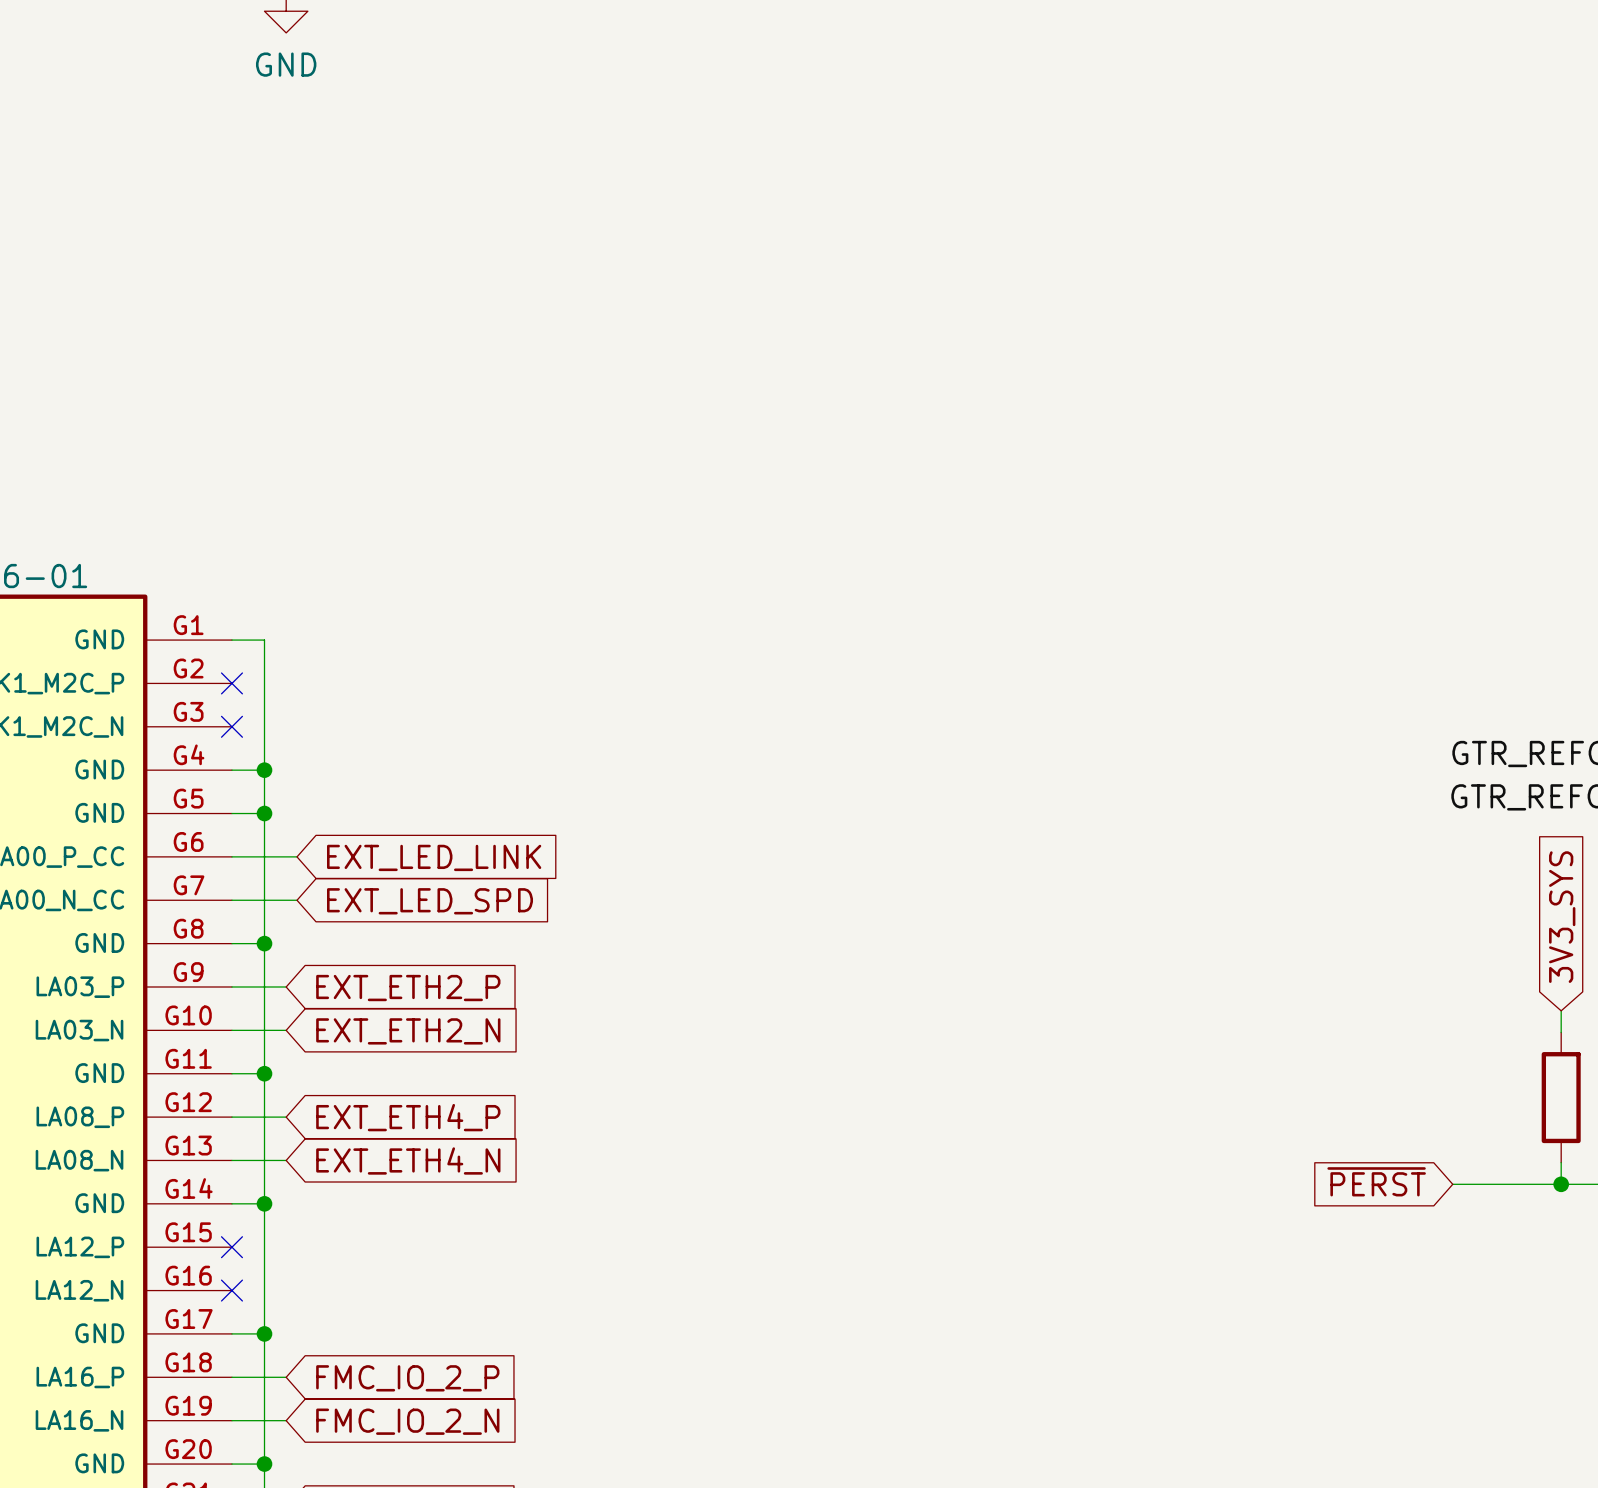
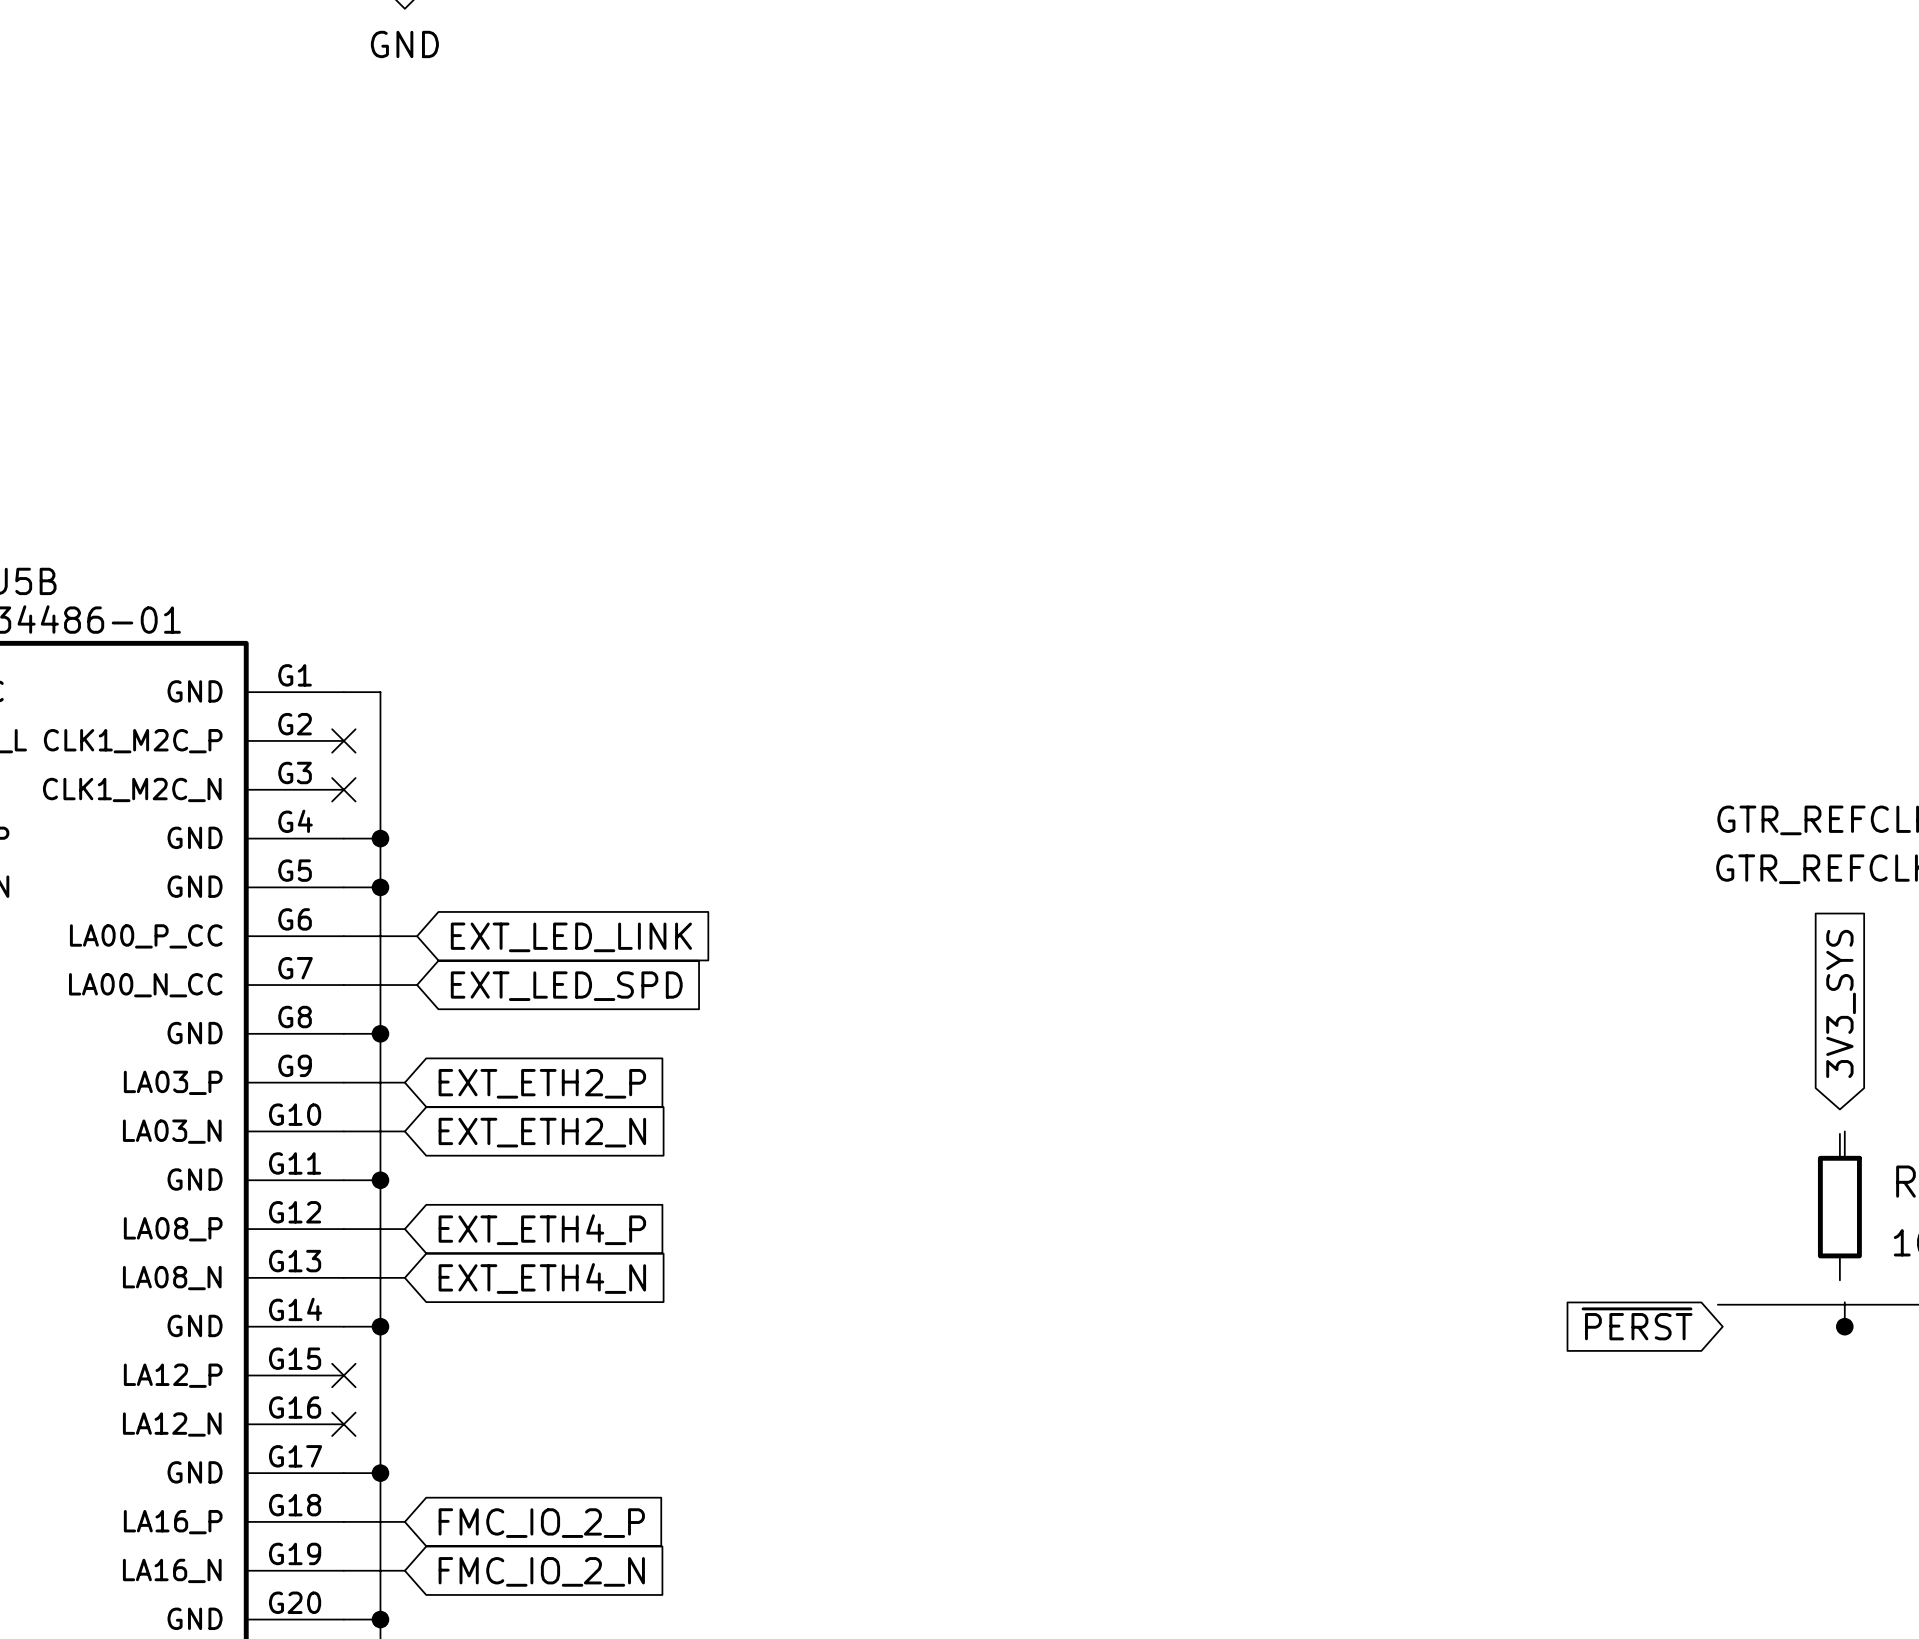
wire: (1561, 1010) (1561, 1032) -> (1844, 1131) (1844, 1155)
wire: (1561, 1162) (1561, 1184) -> (1844, 1302) (1844, 1326)
global label position: ~{PERST} (1376, 1181) -> ~{PERST} (1637, 1323)
junction position: (1561, 1184) -> (1844, 1326)

